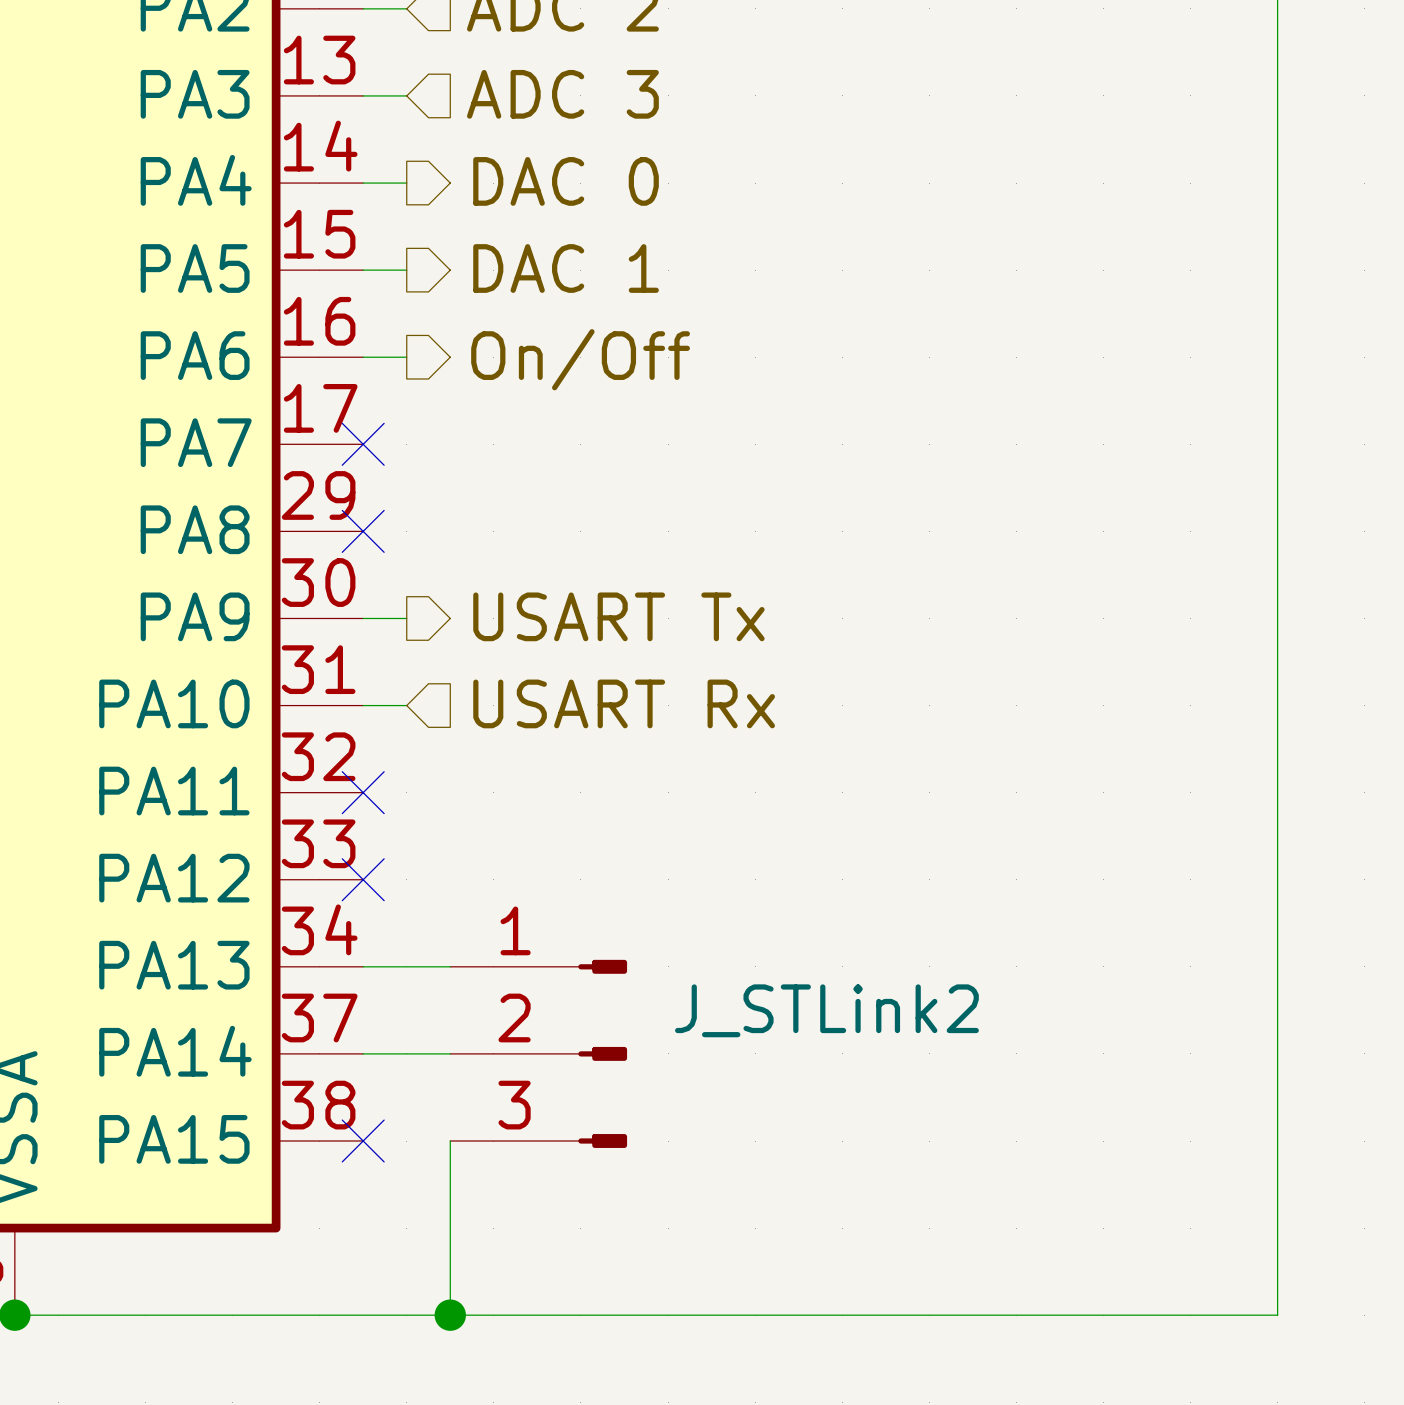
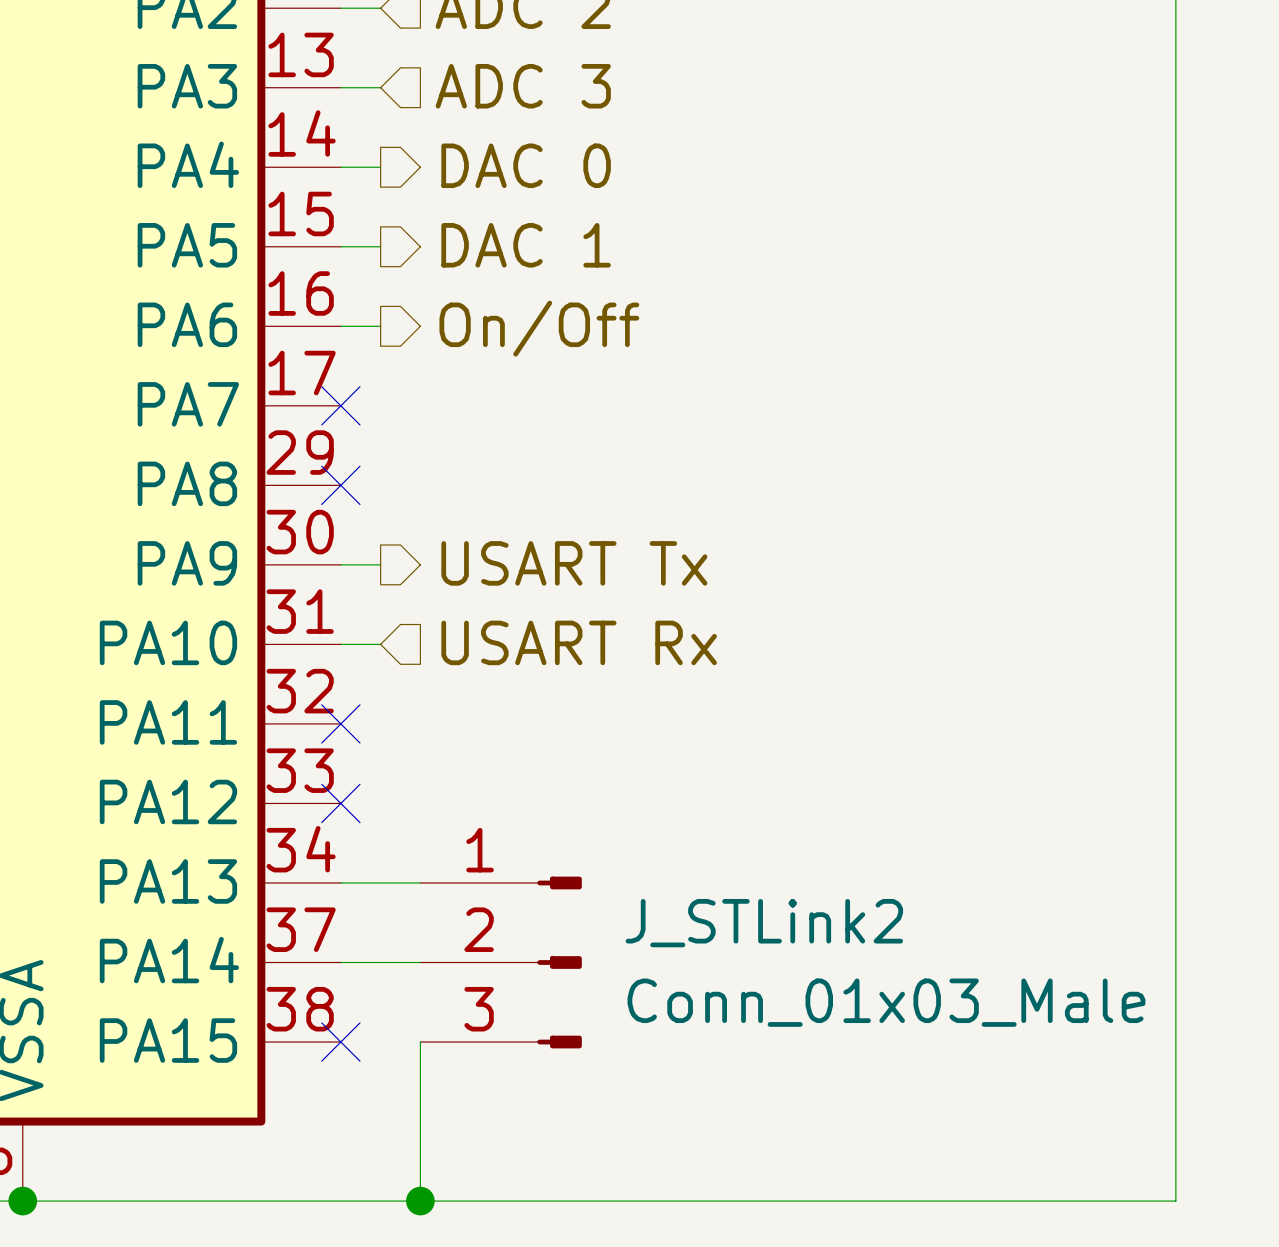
J_STLink2 value: none -> Conn_01x03_Male (886, 1002)

